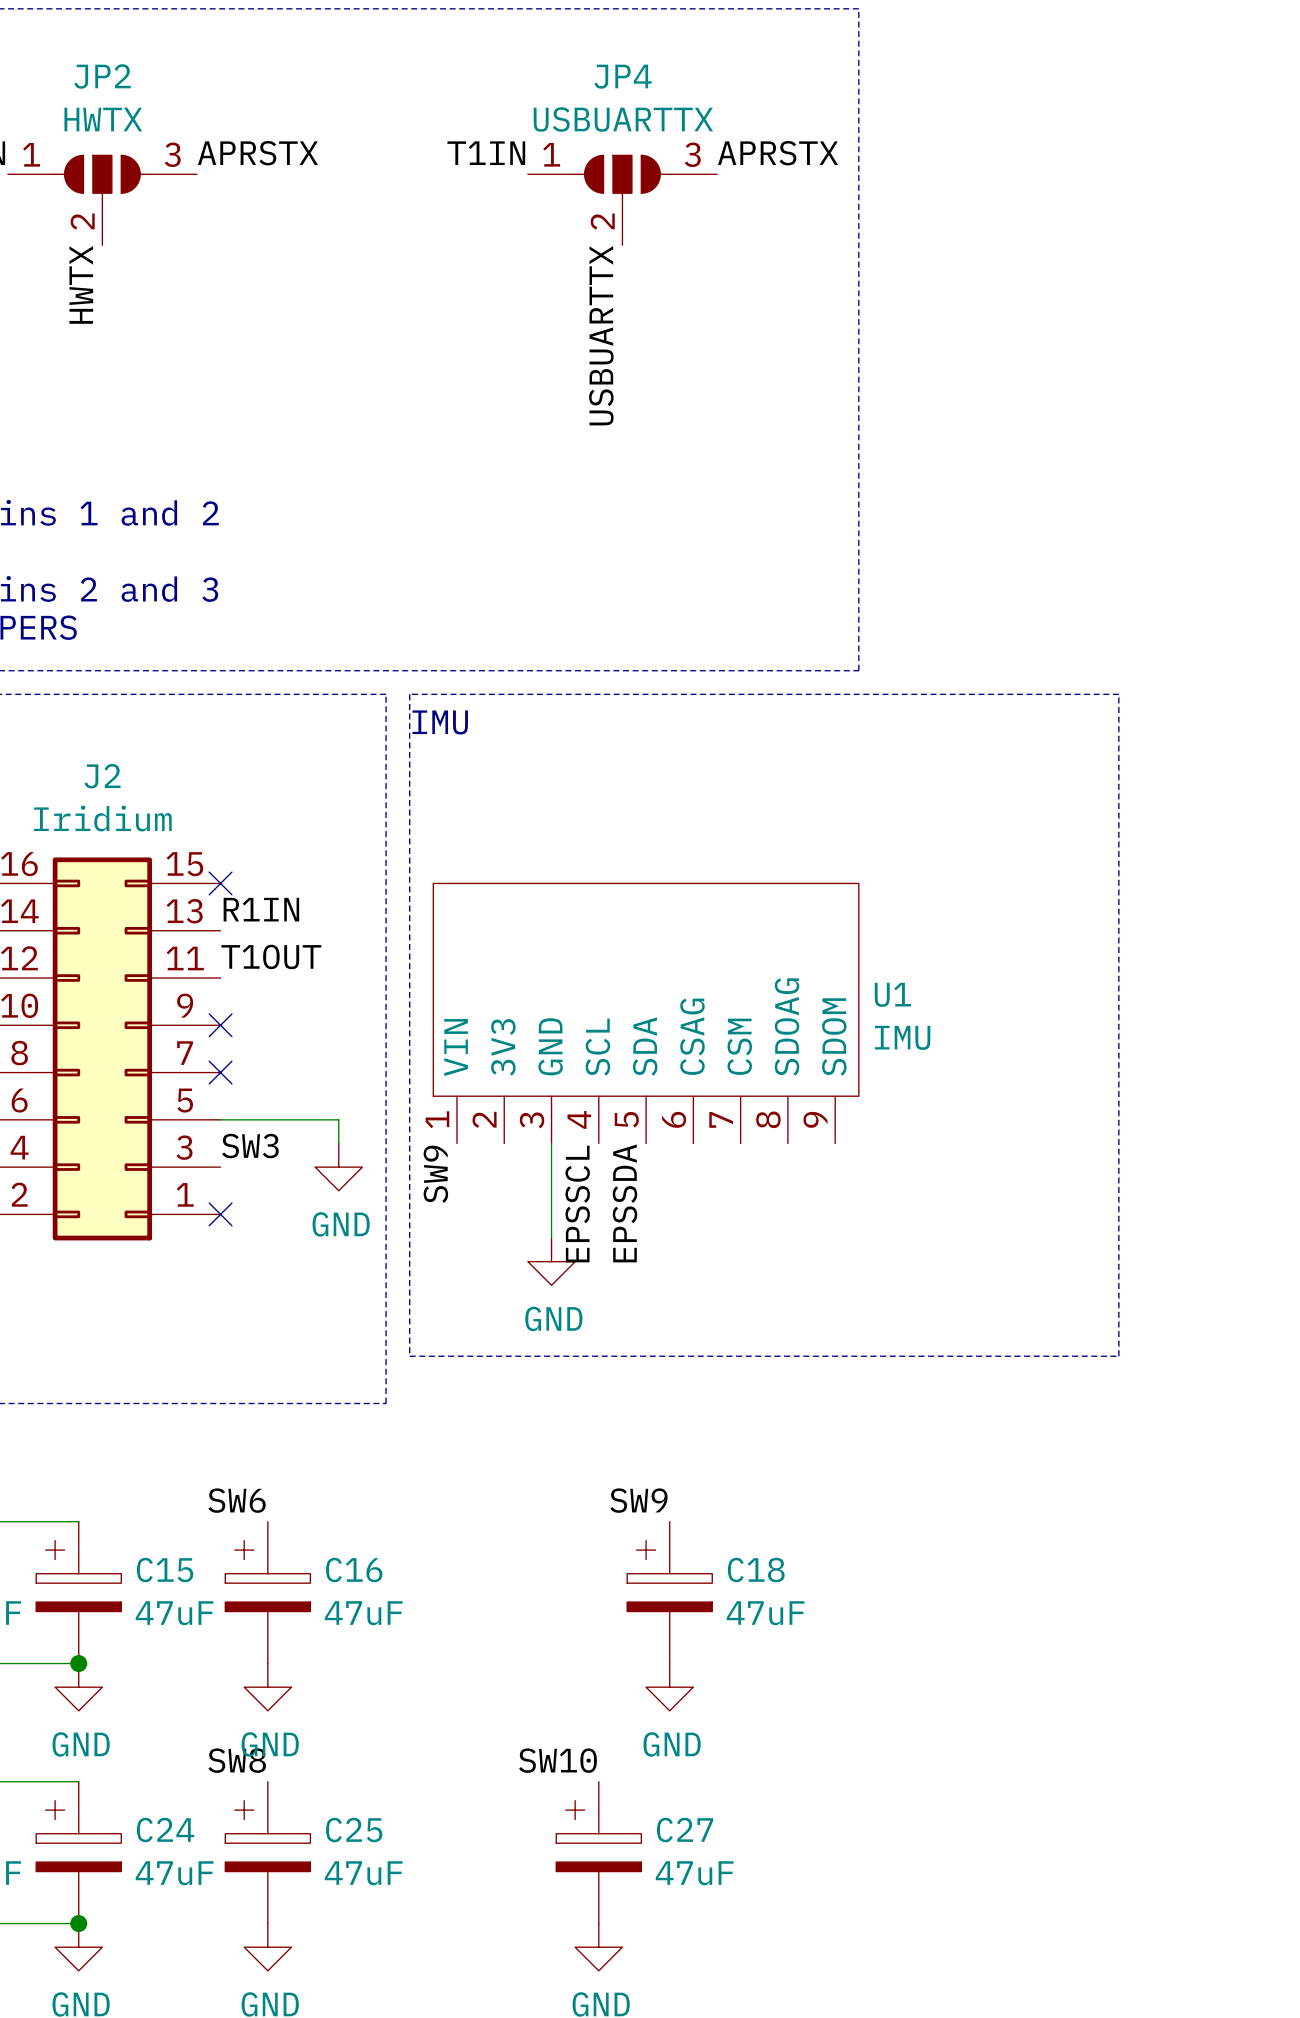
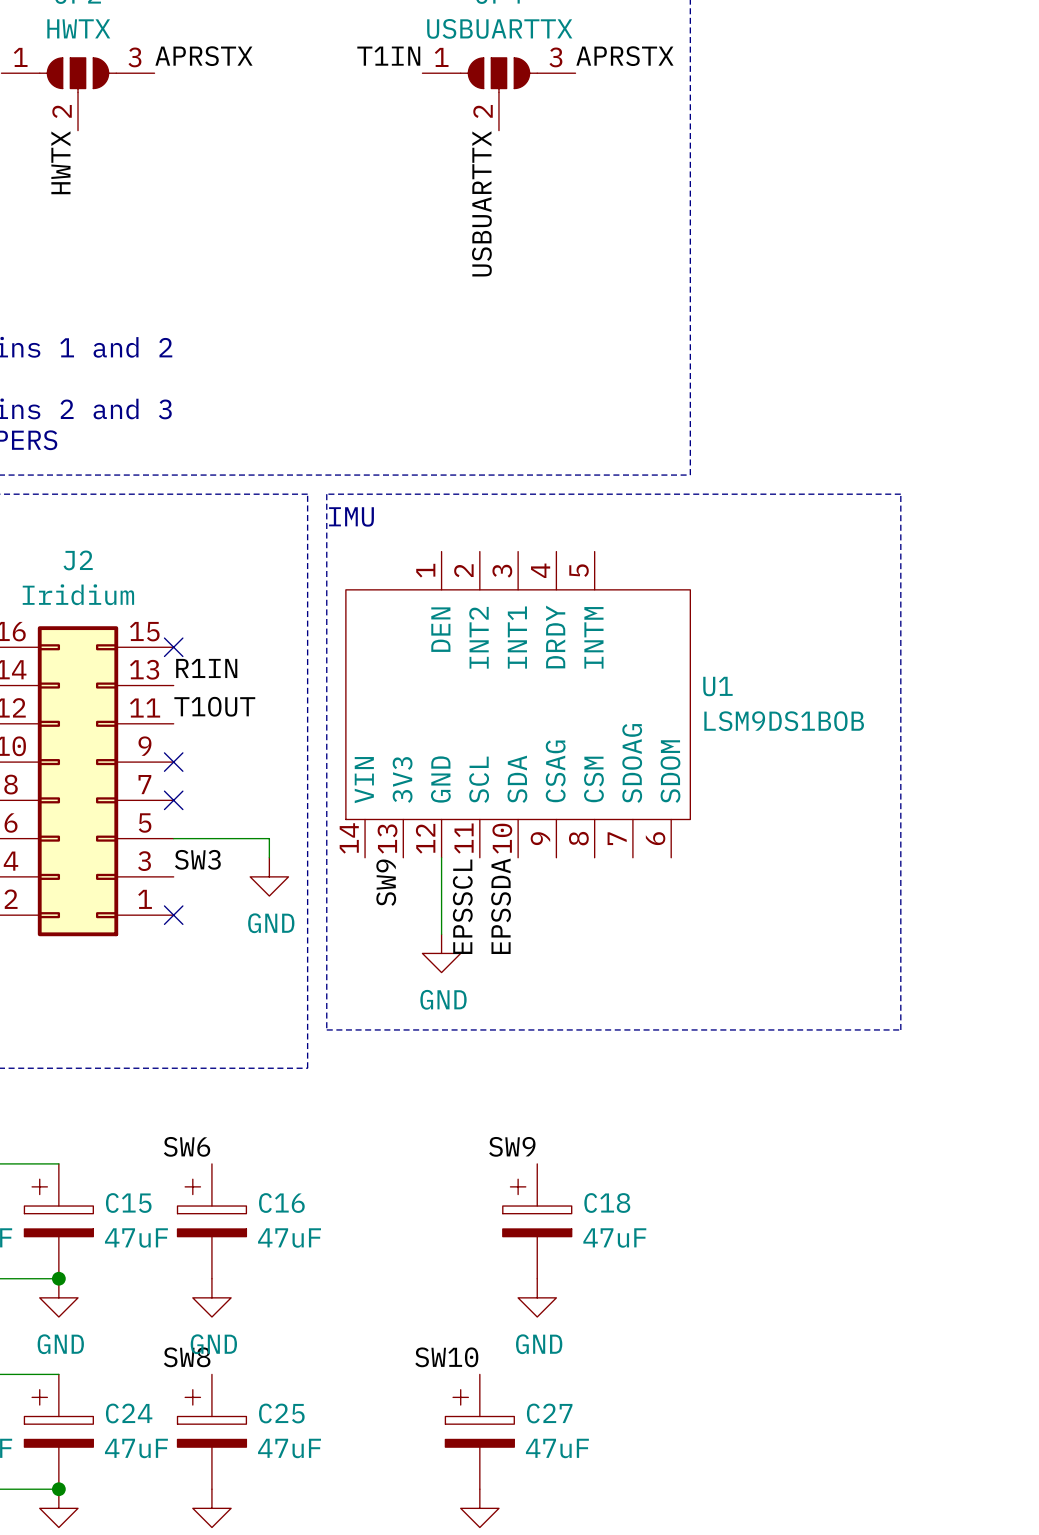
U1 symbol: [433, 883, 859, 1144] -> [345, 551, 691, 858]
U1 value: IMU (902, 1037) -> LSM9DS1BOB (784, 721)
label position: SW9 (435, 1174) -> SW9 (386, 882)

